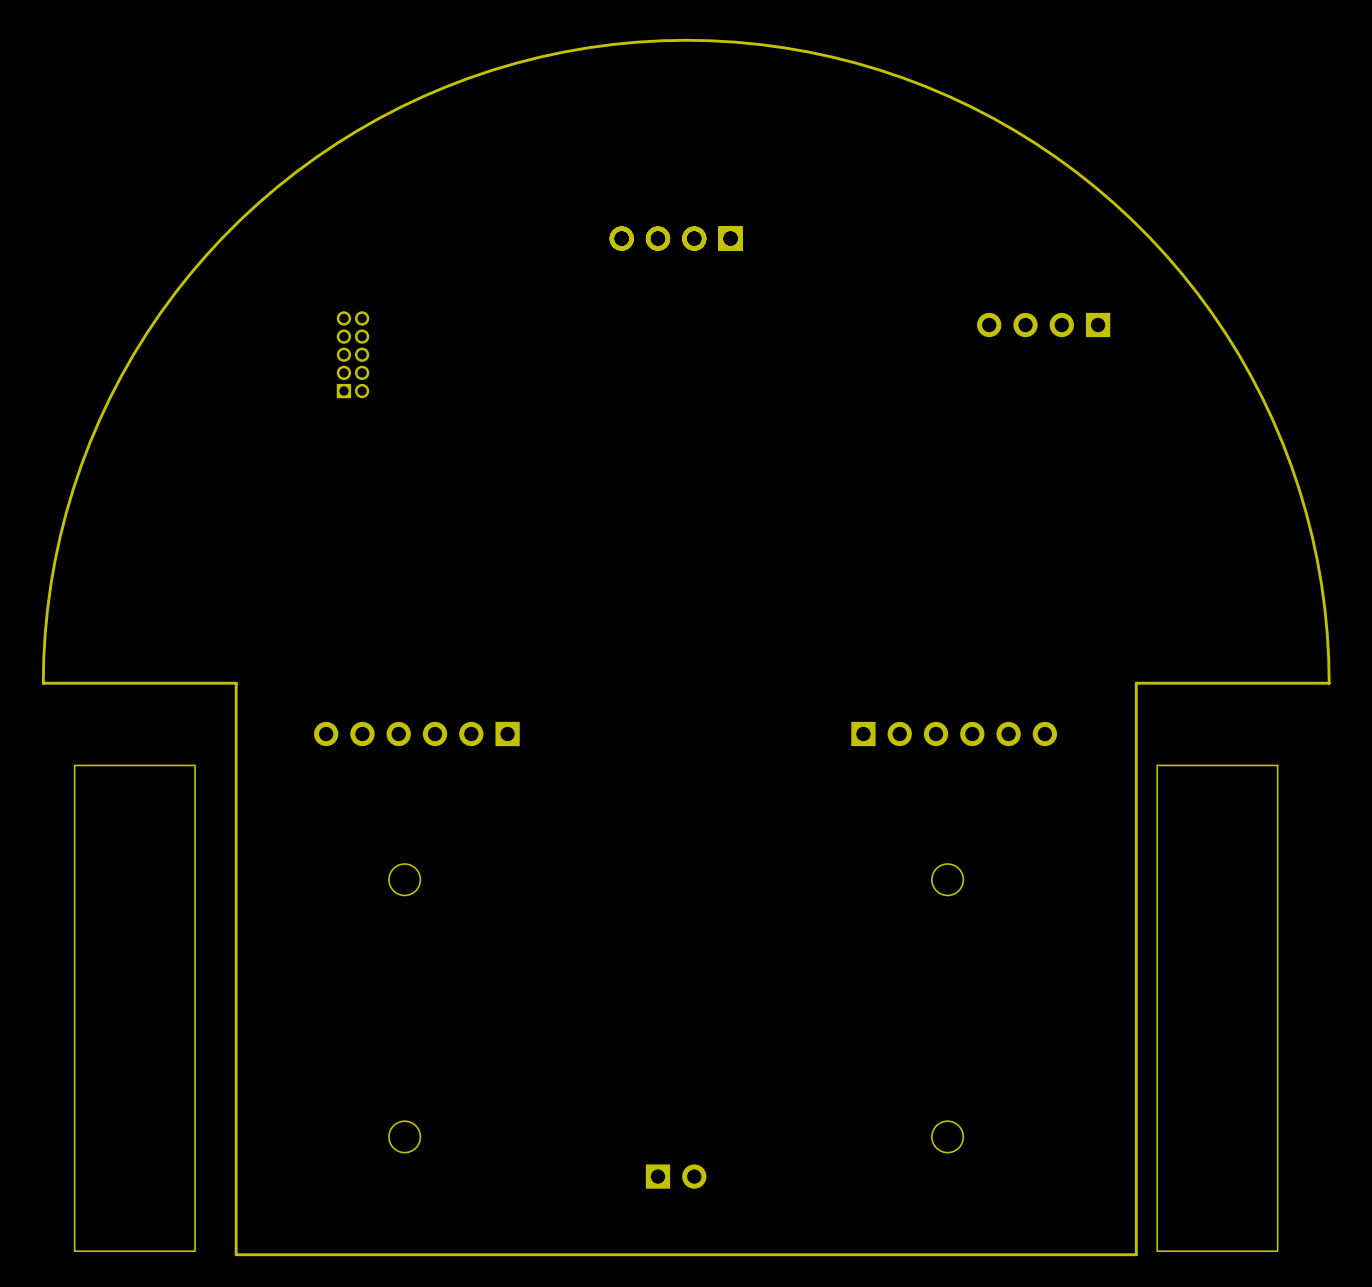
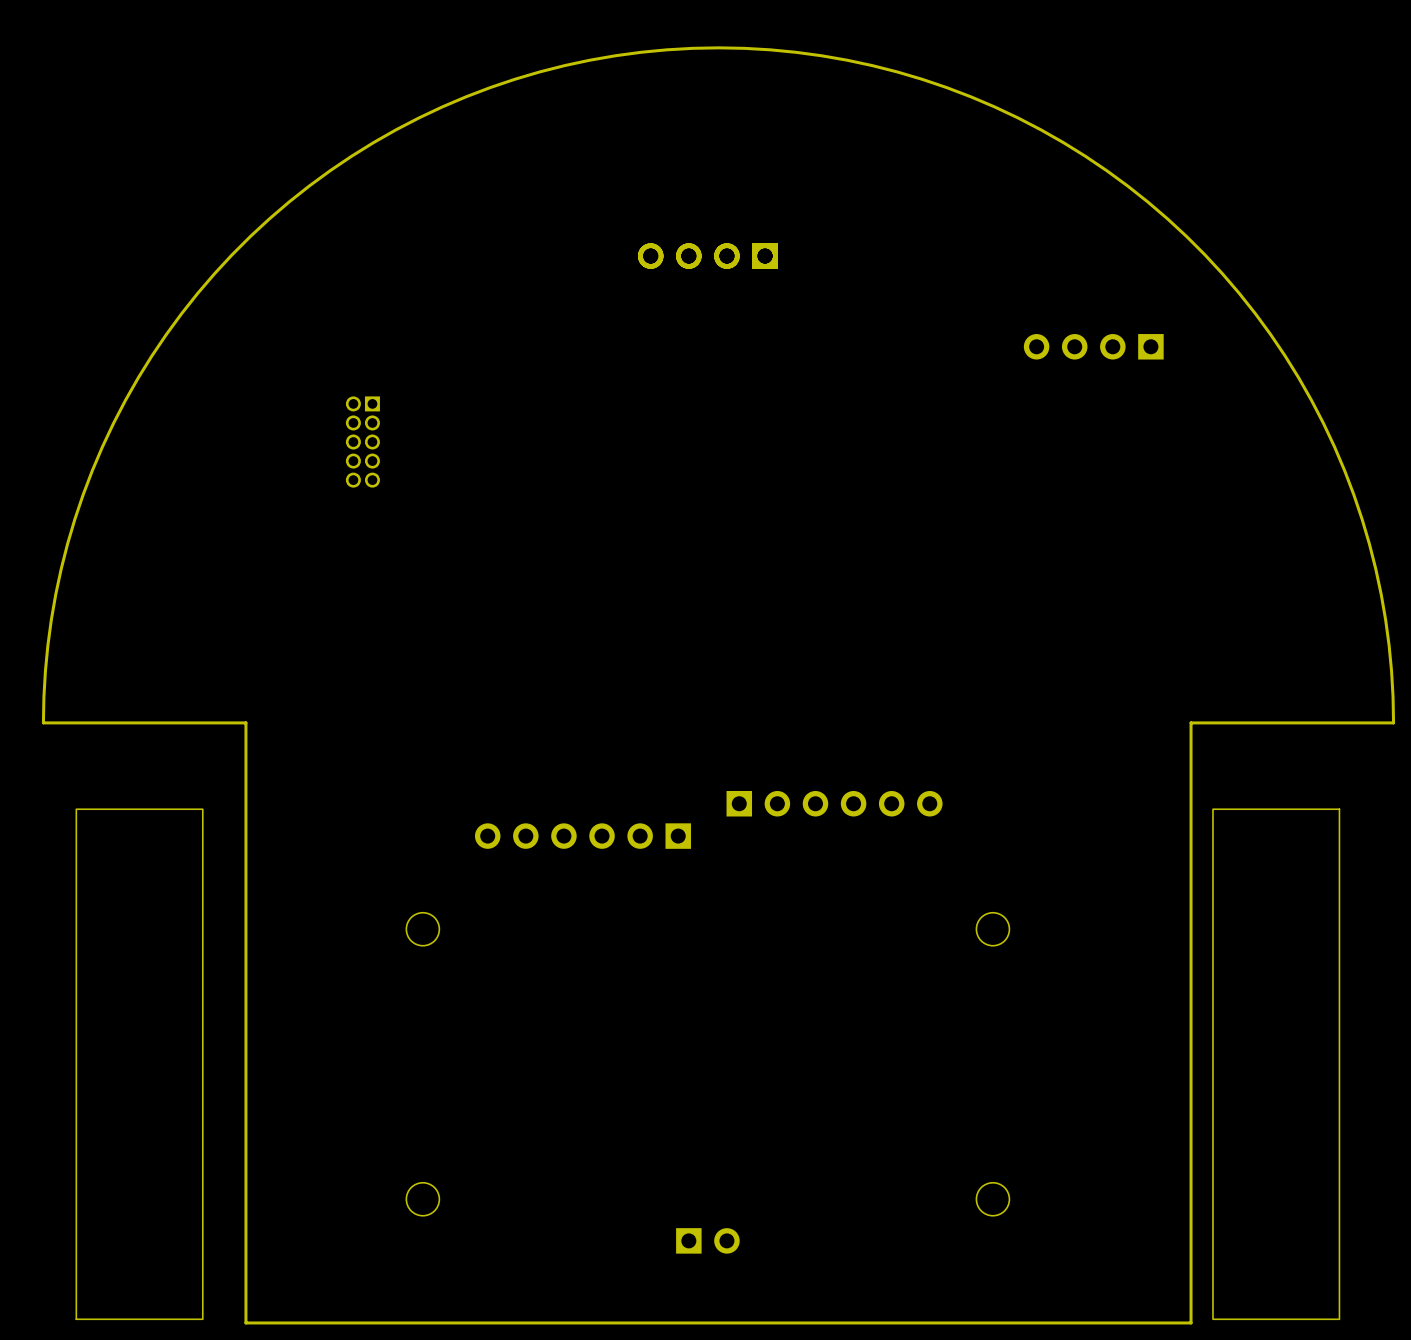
part rotation: 0° (353, 354) -> 180° (362, 442)
part position: (353, 354) -> (362, 442)
part position: (416, 734) -> (582, 836)
part position: (954, 734) -> (834, 803)

